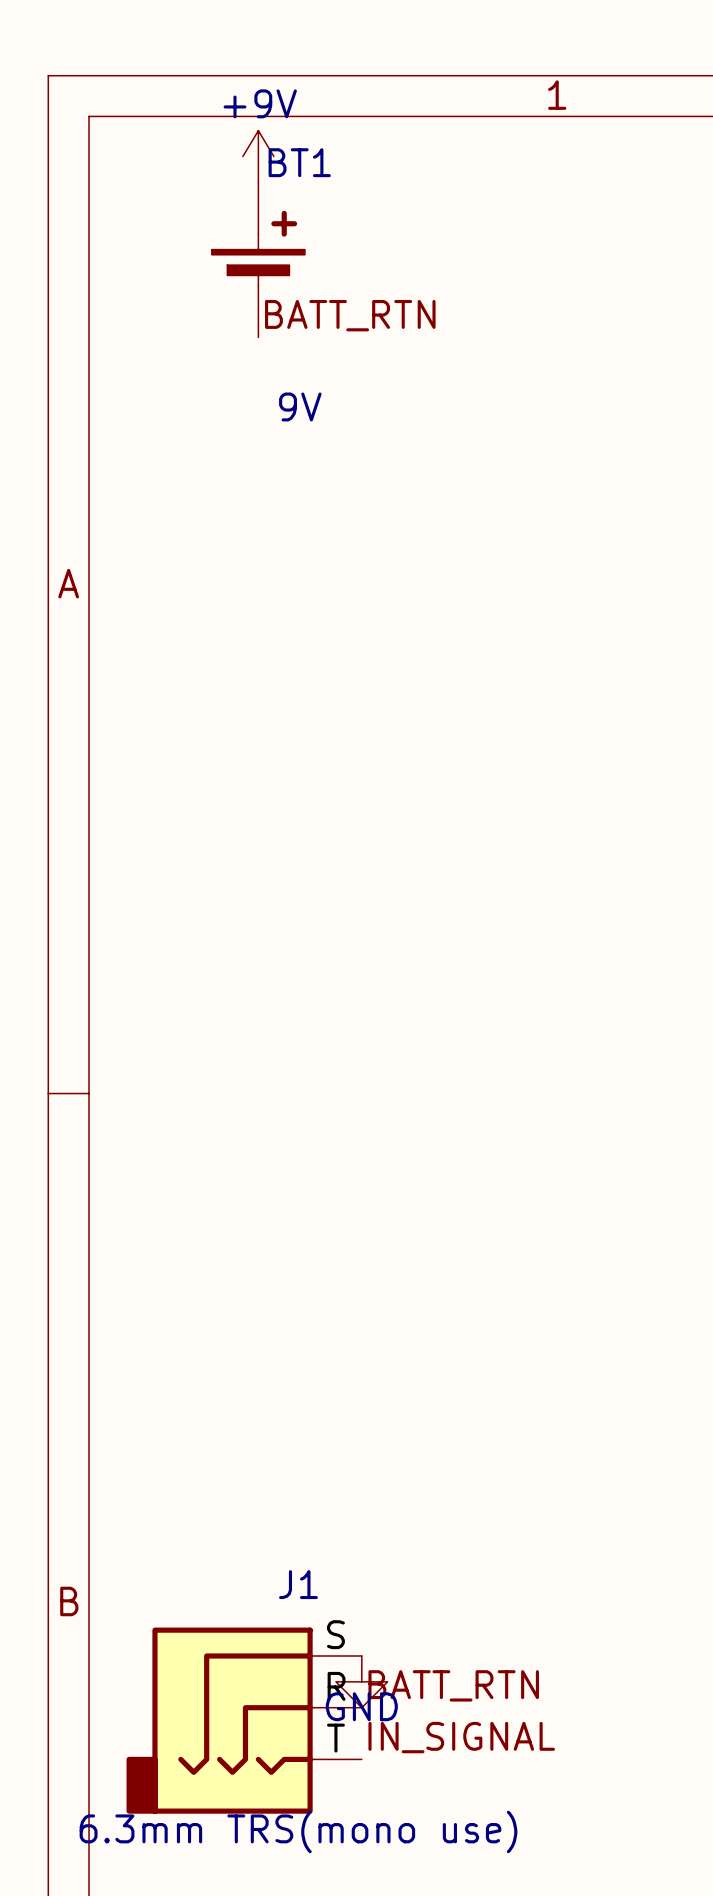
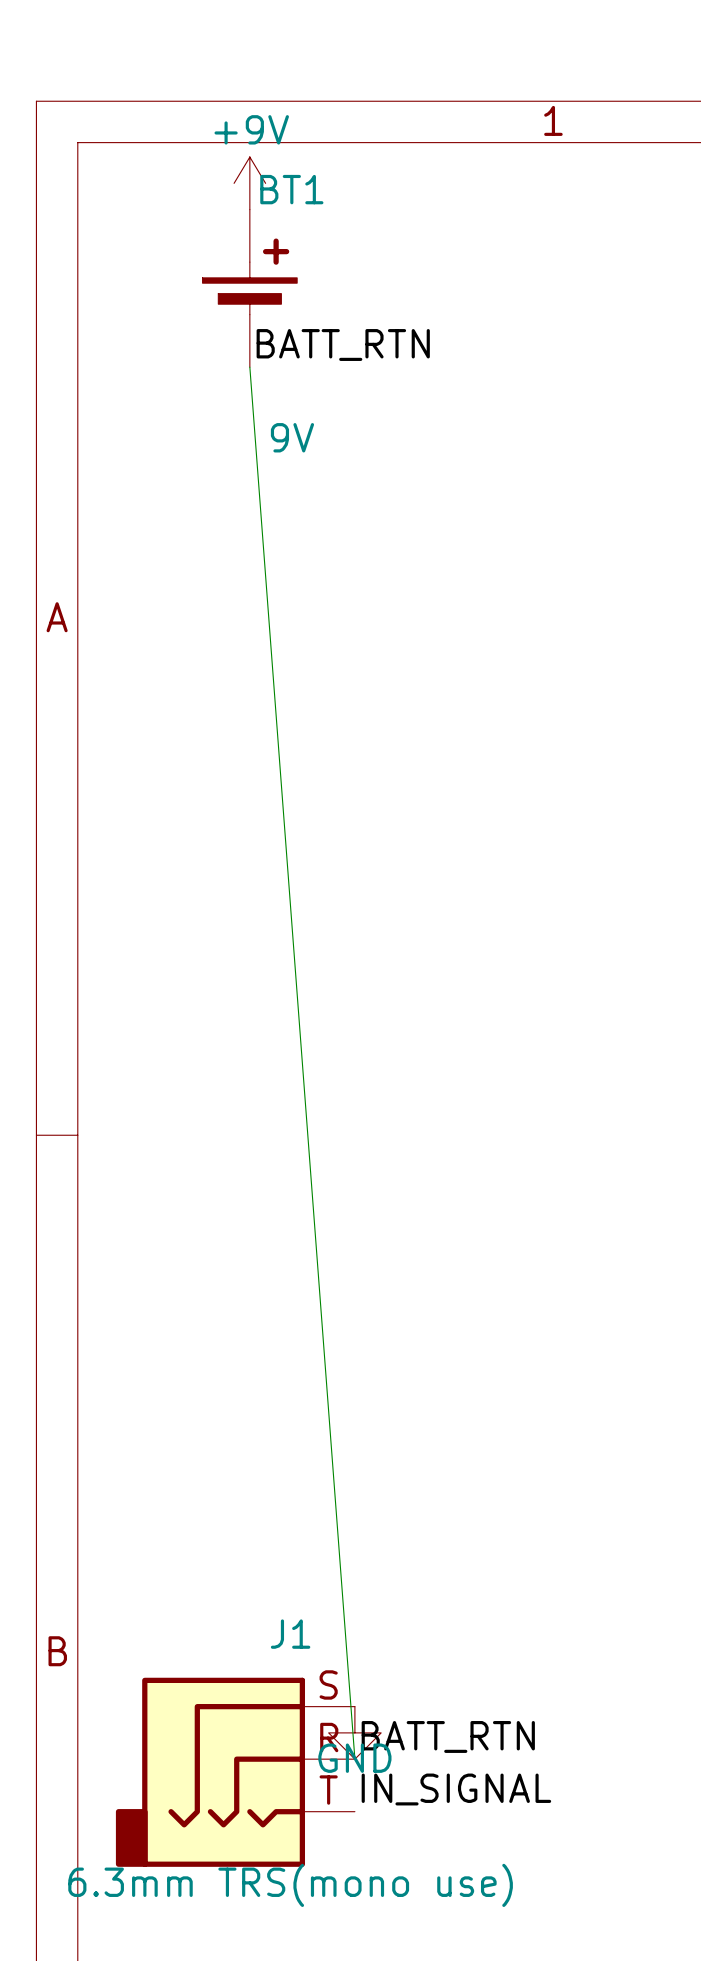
wire: none -> (249, 367) (354, 1759)

